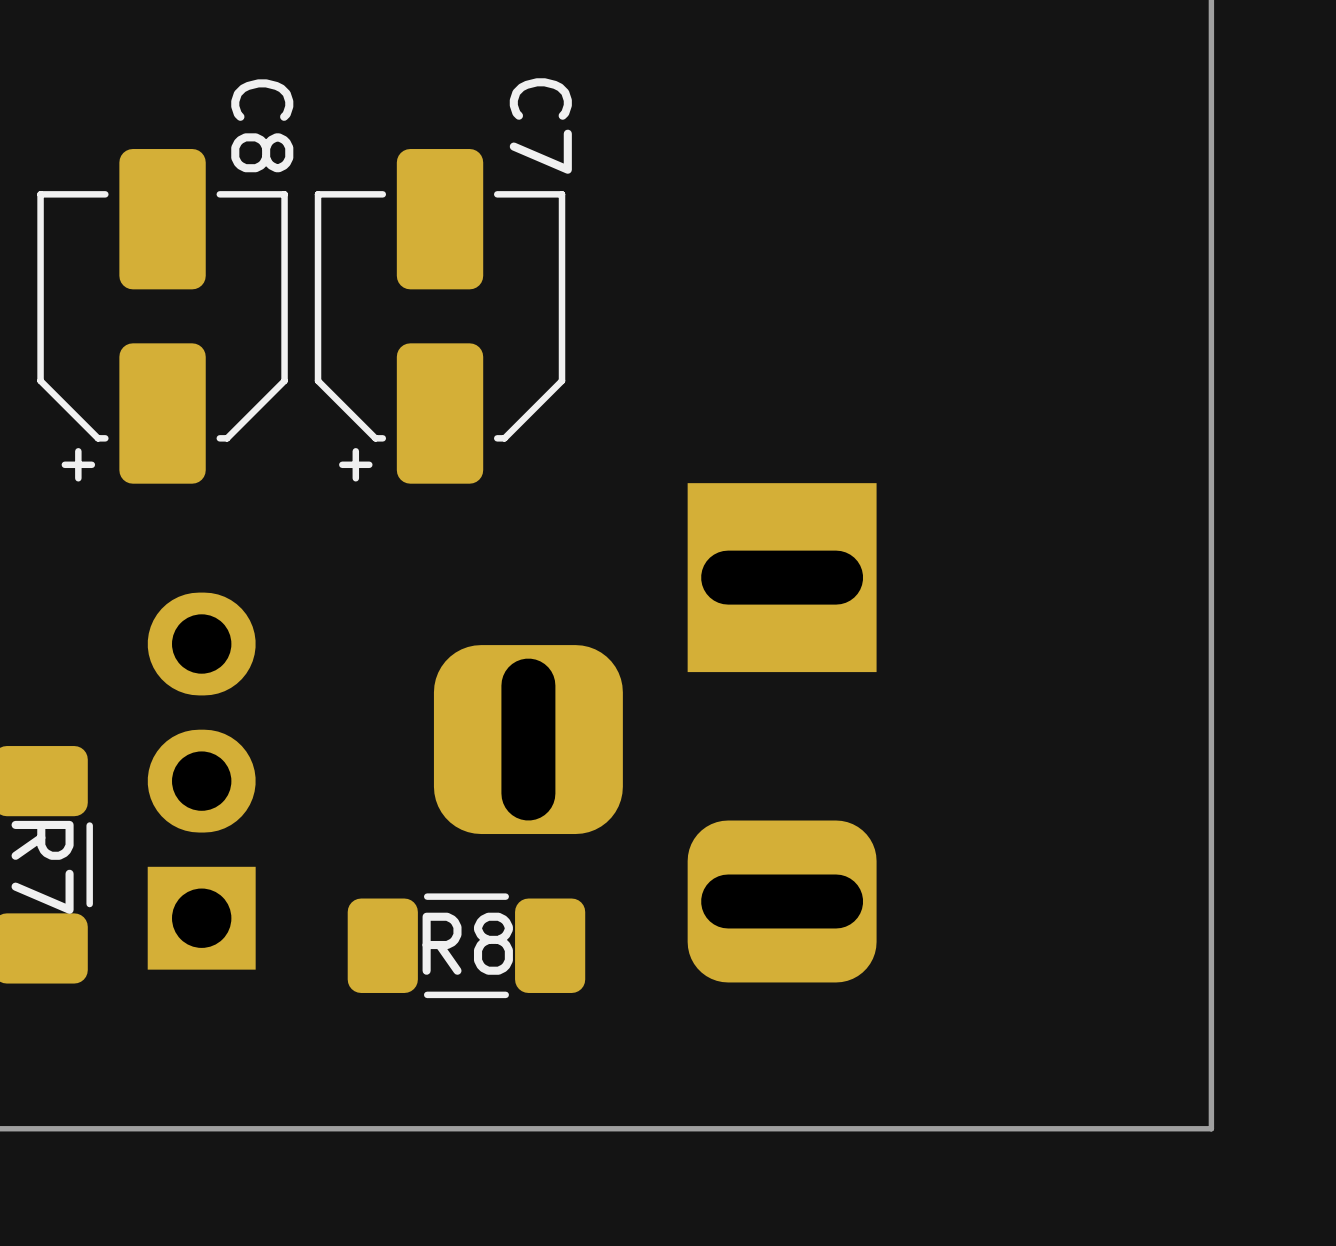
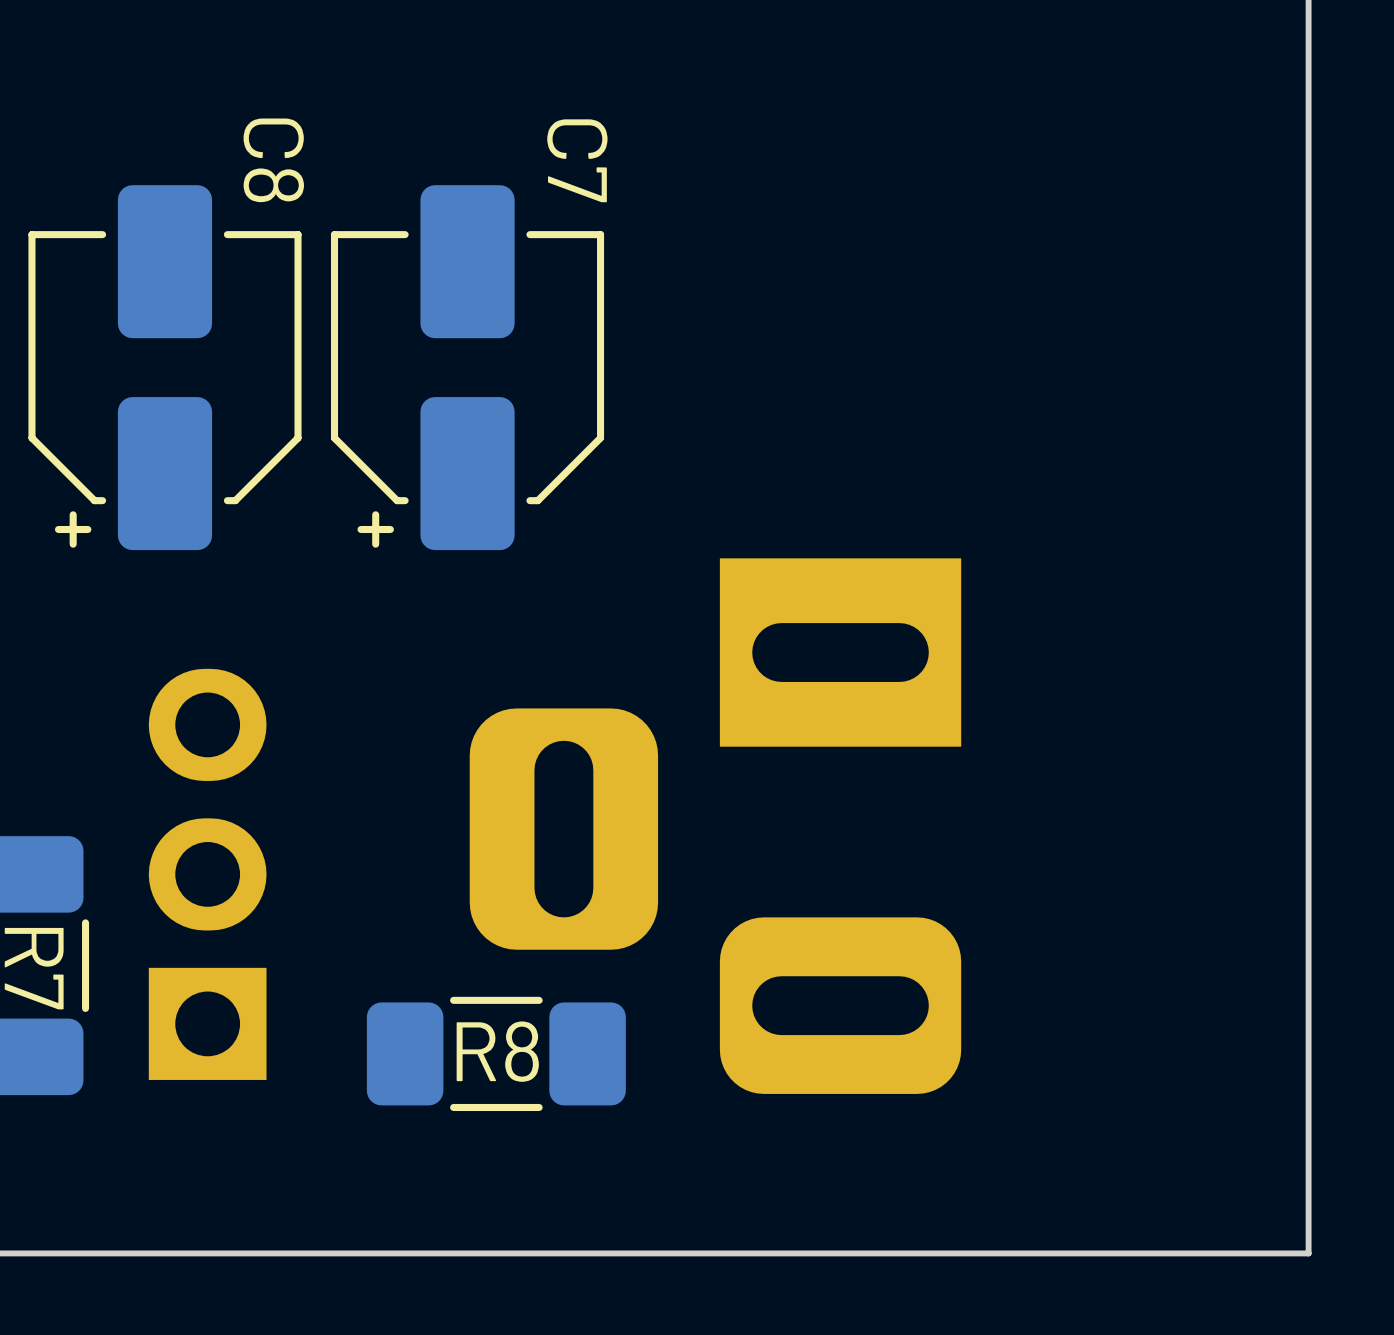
part footprint: [433, 483, 877, 983] -> [469, 558, 962, 1094]

